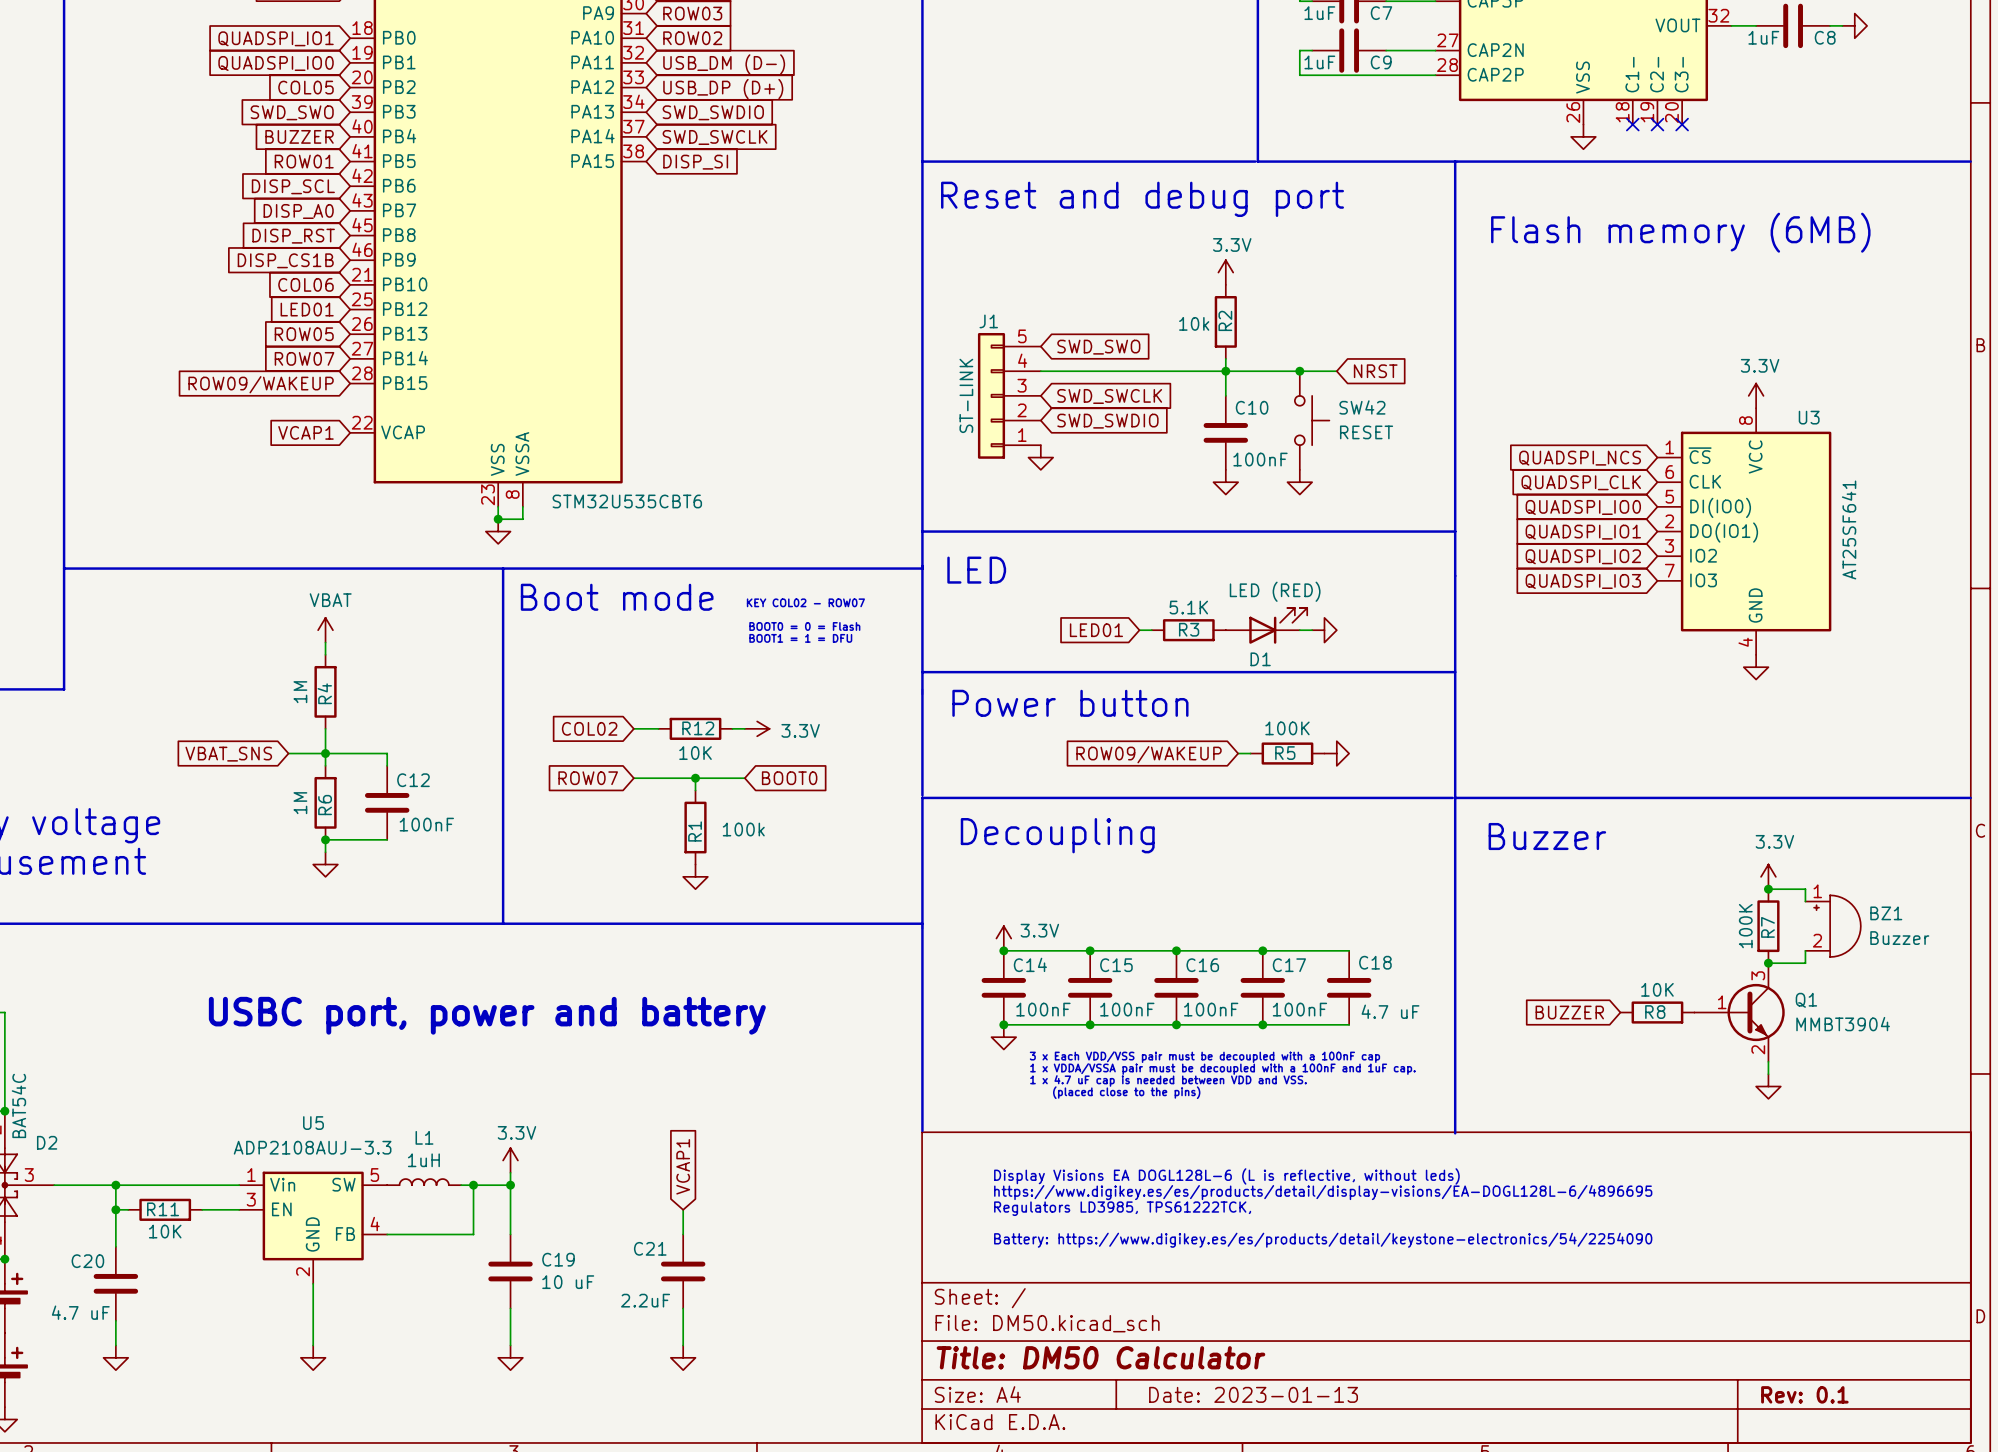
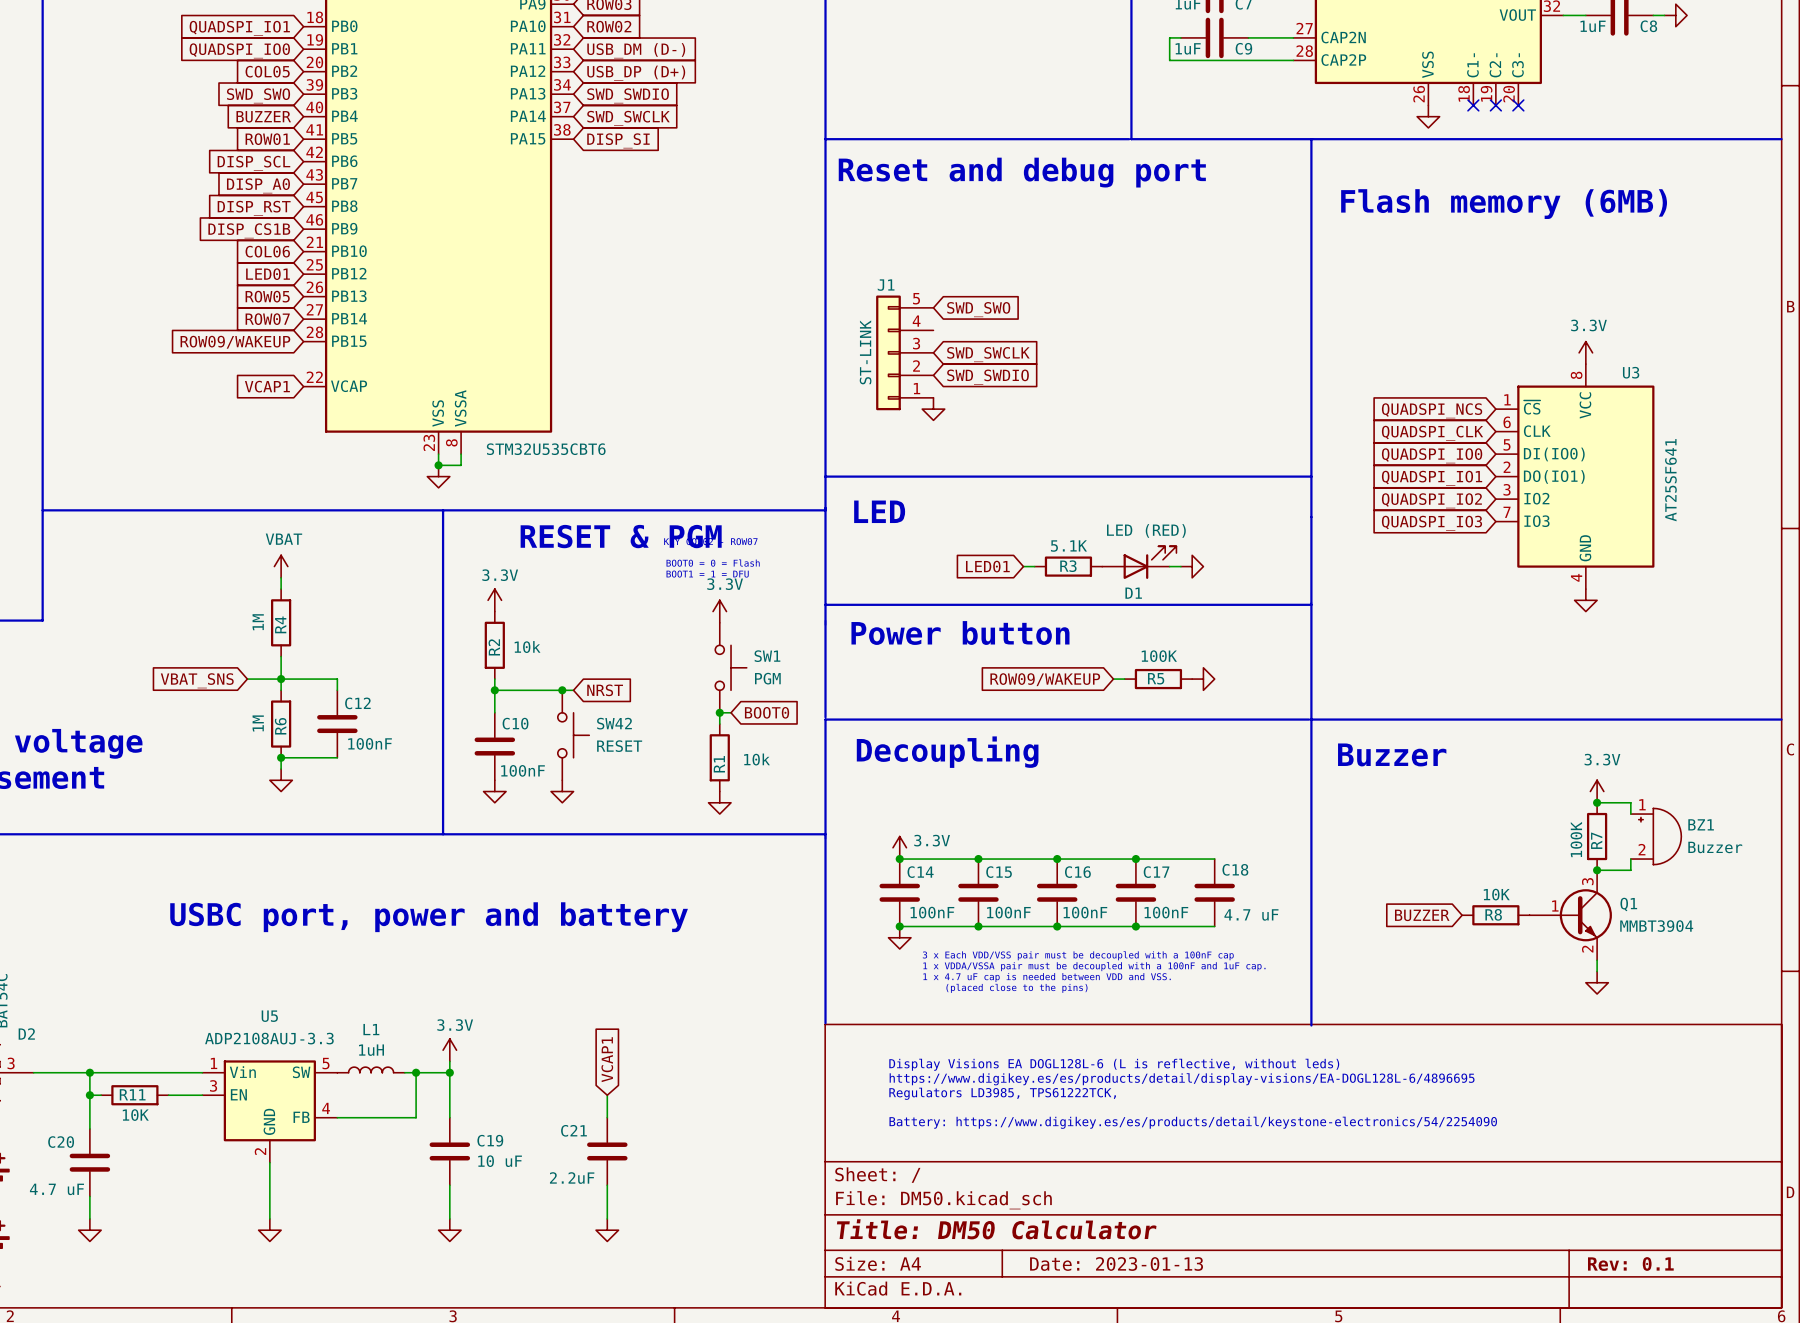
power symbol: 3.3V (1225, 272) -> none
R2 position: (1225, 321) -> (494, 645)
R2 value position: 10k (1194, 323) -> 10k (527, 647)
wire: (1225, 358) (1225, 395) -> none
wire: (1040, 371) (1336, 371) -> none
junction: (1225, 371) -> none
junction: (1299, 371) -> none
global label: NRST (1375, 371) -> none
SW42 position: (1312, 420) -> (573, 735)
C10 position: (1225, 432) -> (494, 746)
power symbol: (1225, 482) -> none
power symbol: (1299, 482) -> none
text: Boot mode (617, 597) -> none
text: none -> RESET & PGM (621, 536)
power symbol: none -> 3.3V (494, 600)
global label: COL02 (589, 728) -> none
wire: (633, 728) (658, 728) -> none
R12: 10K (695, 728) -> none
wire: (732, 728) (744, 728) -> none
power symbol rotation: 0° (757, 728) -> 90° counterclockwise (719, 611)
power symbol position: 3.3V (757, 728) -> 3.3V (719, 611)
power symbol text position: 3.3V (800, 730) -> 3.3V (725, 584)
SW1: none -> PGM (731, 667)
wire: none -> (494, 679) (494, 712)
junction: none -> (494, 690)
junction: none -> (562, 690)
global label: none -> NRST (605, 690)
global label: ROW07 (588, 778) -> none
wire: (633, 778) (744, 778) -> none
wire: (695, 778) (695, 790) -> none
junction: (695, 778) -> none
global label position: BOOT0 (789, 778) -> BOOT0 (767, 712)
junction: none -> (719, 712)
wire: none -> (731, 712) (719, 712) (719, 724)
R1 position: (695, 827) -> (719, 757)
R1 value: 100k (743, 829) -> 10k (757, 759)
power symbol: none -> (494, 791)
power symbol: none -> (562, 791)
power symbol: (695, 876) -> none
power symbol: none -> (719, 802)

